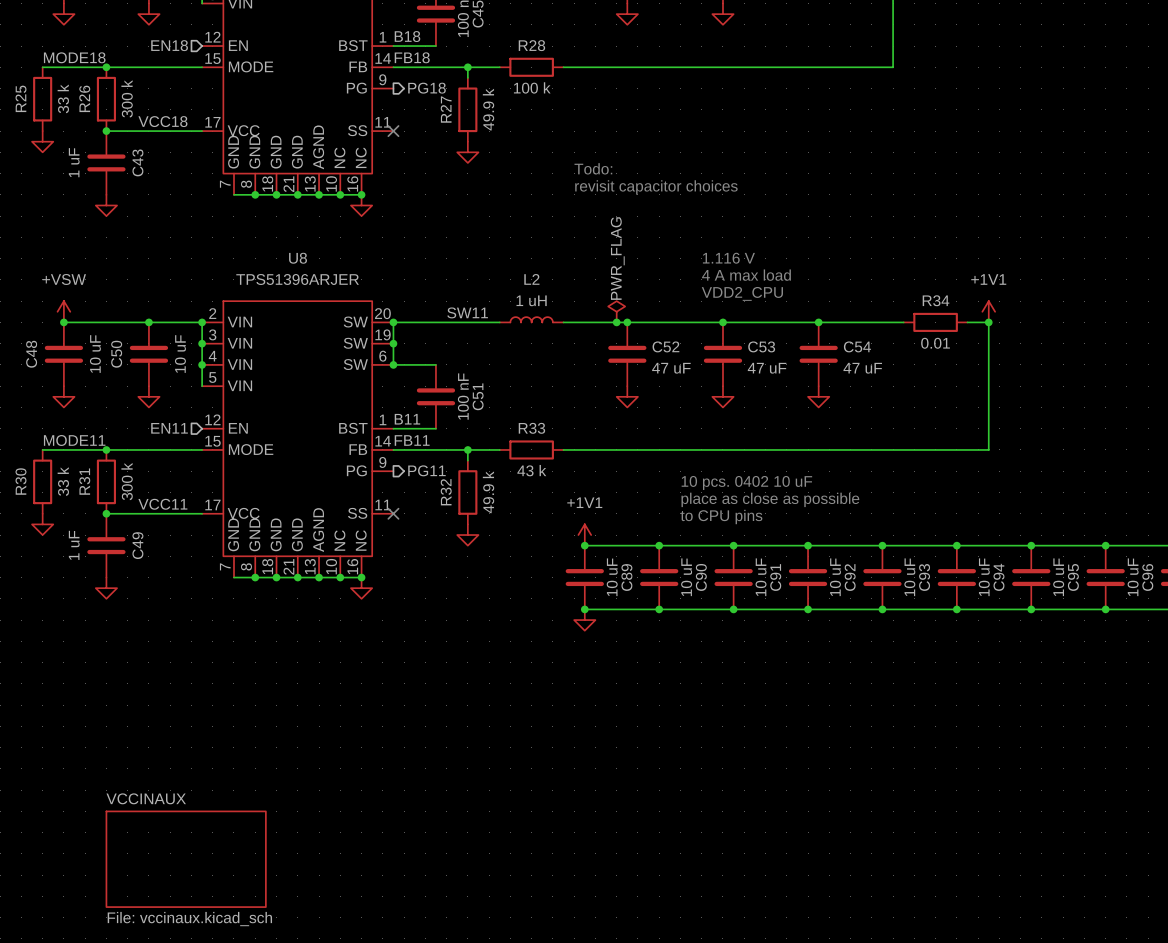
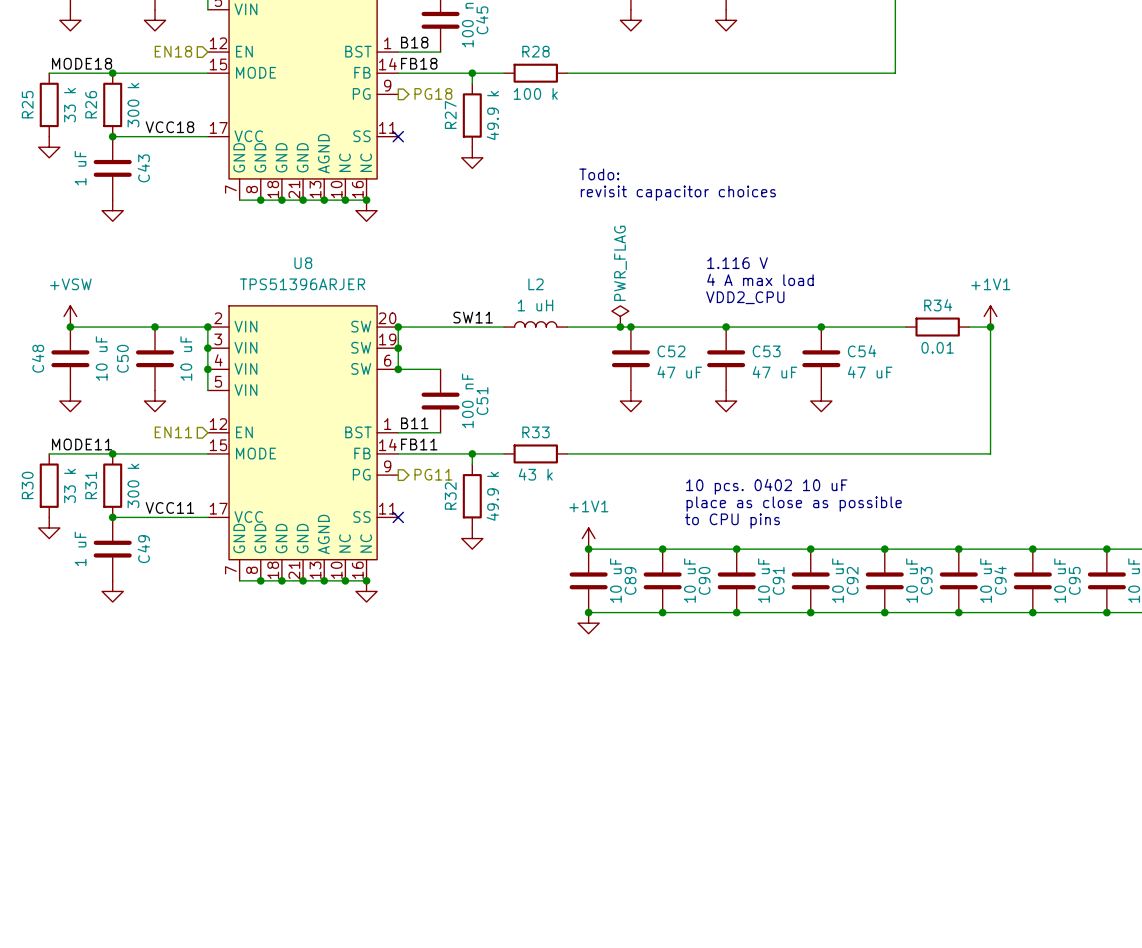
sheet VCCINAUX: File: vccinaux.kicad_sch (186, 859) -> none

